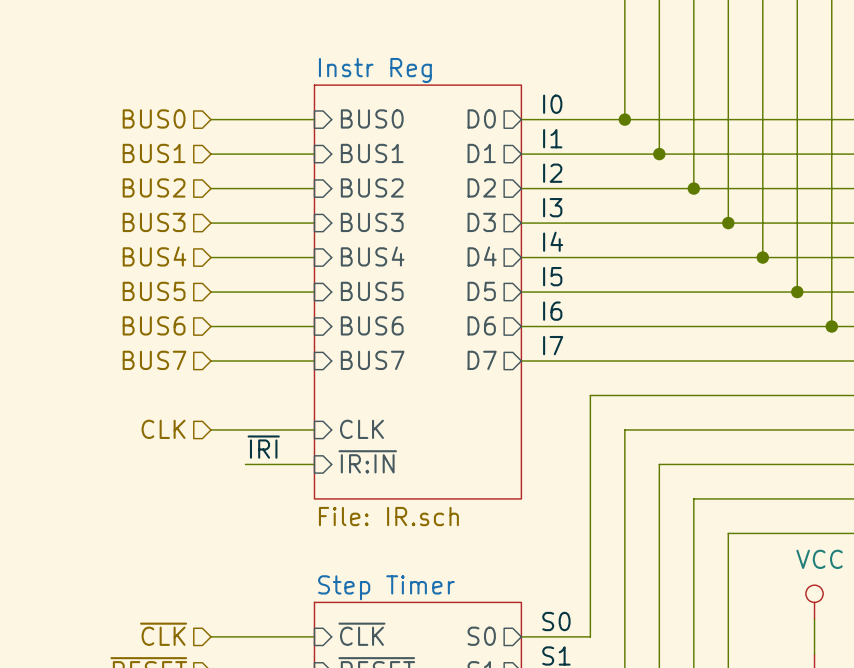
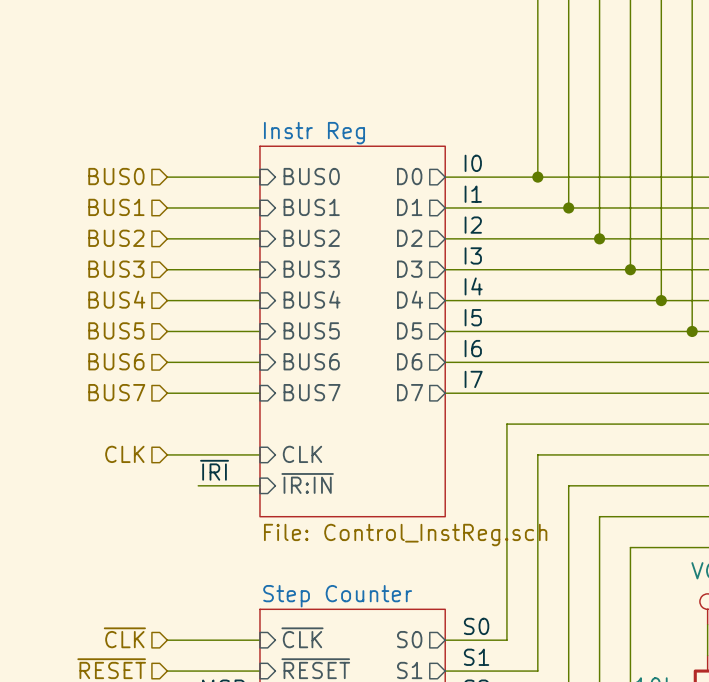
sheet Instr Reg value: File: IR.sch (388, 516) -> File: Control_InstReg.sch (405, 535)
sheet Step Timer name: Step Timer (386, 587) -> Step Counter (337, 596)

